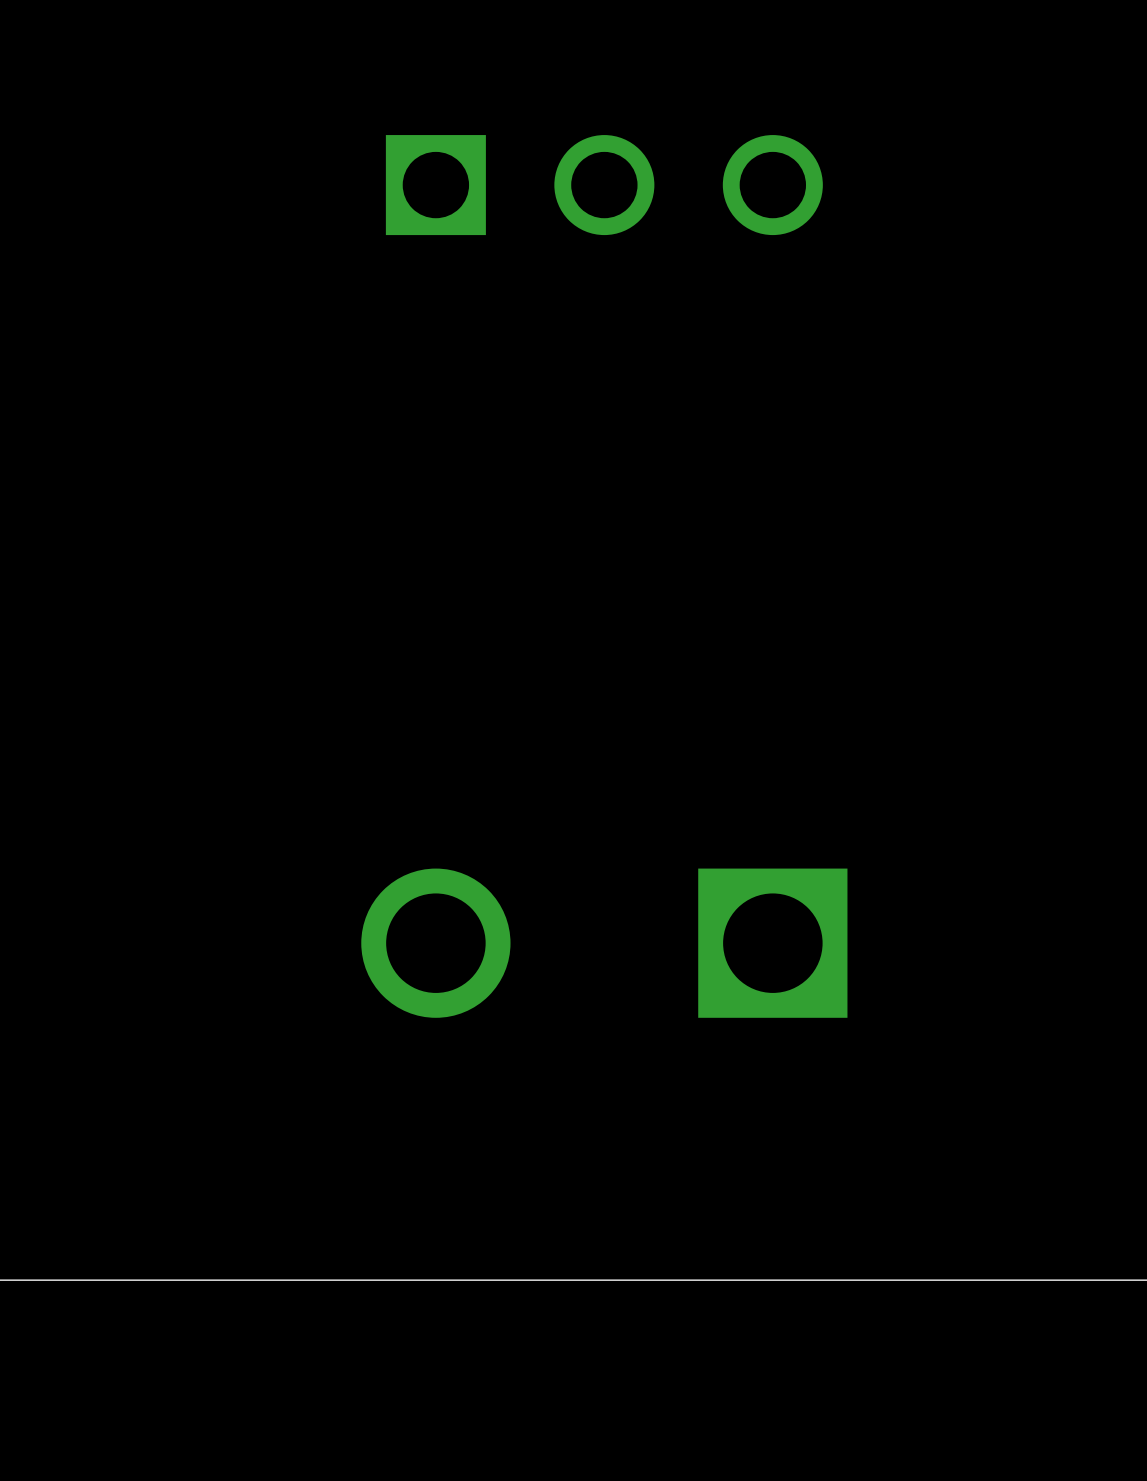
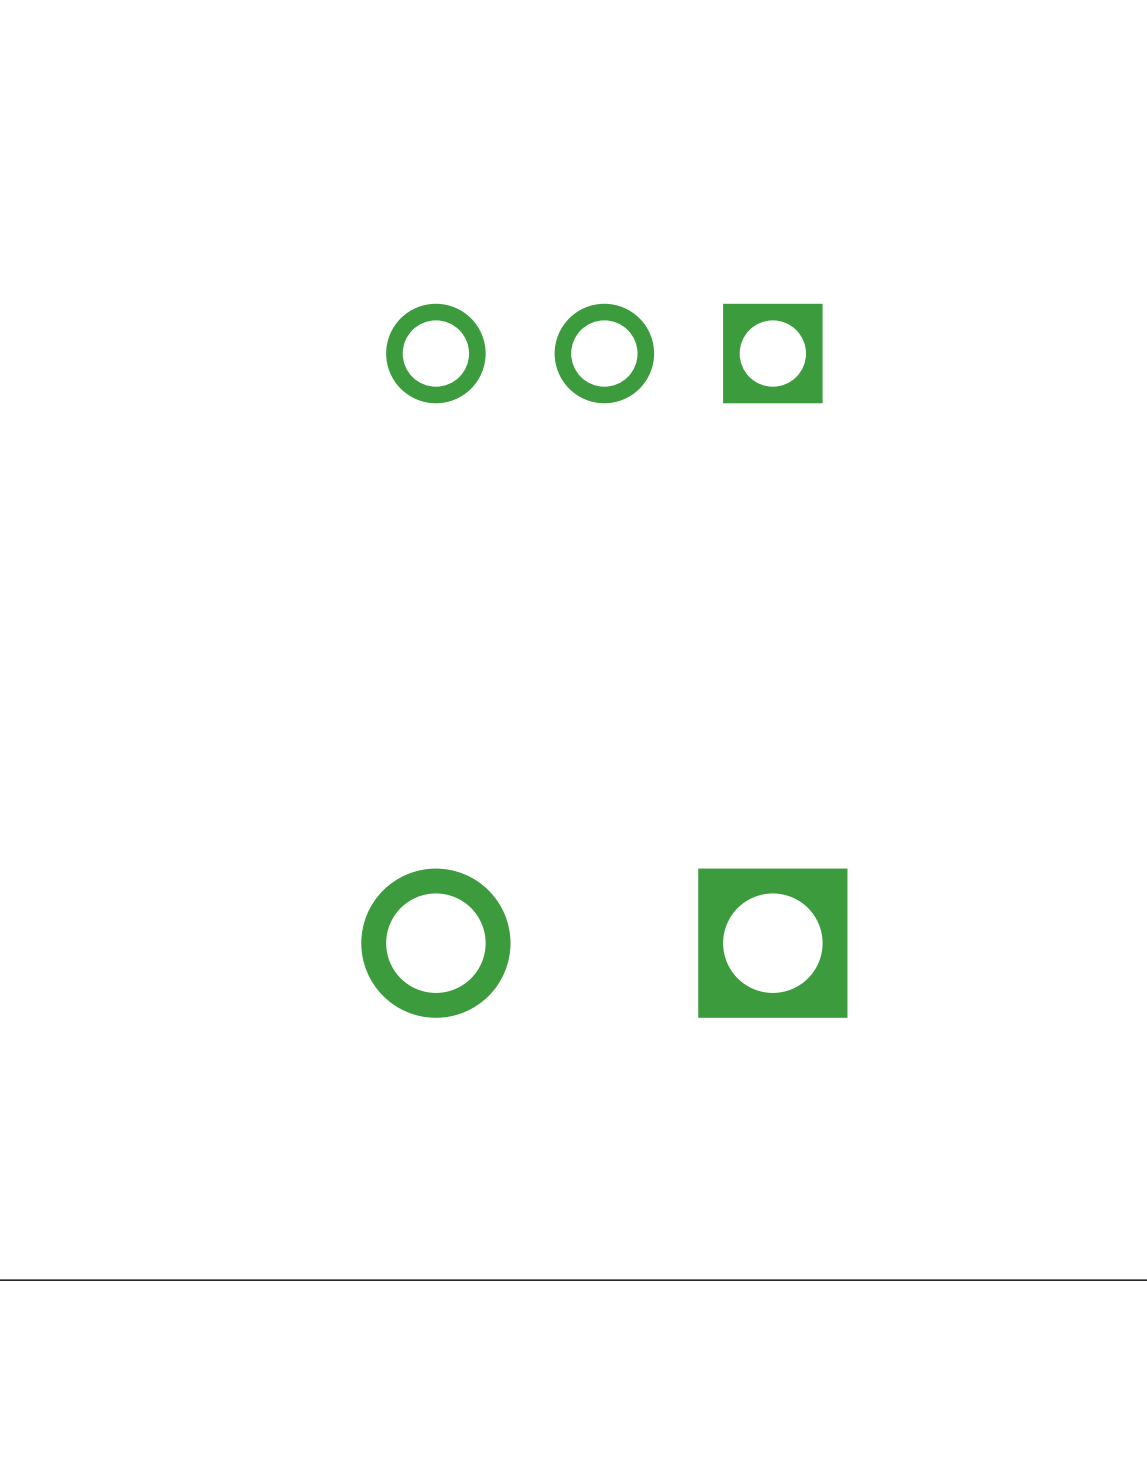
part rotation: 0° (604, 185) -> 180° (604, 353)

